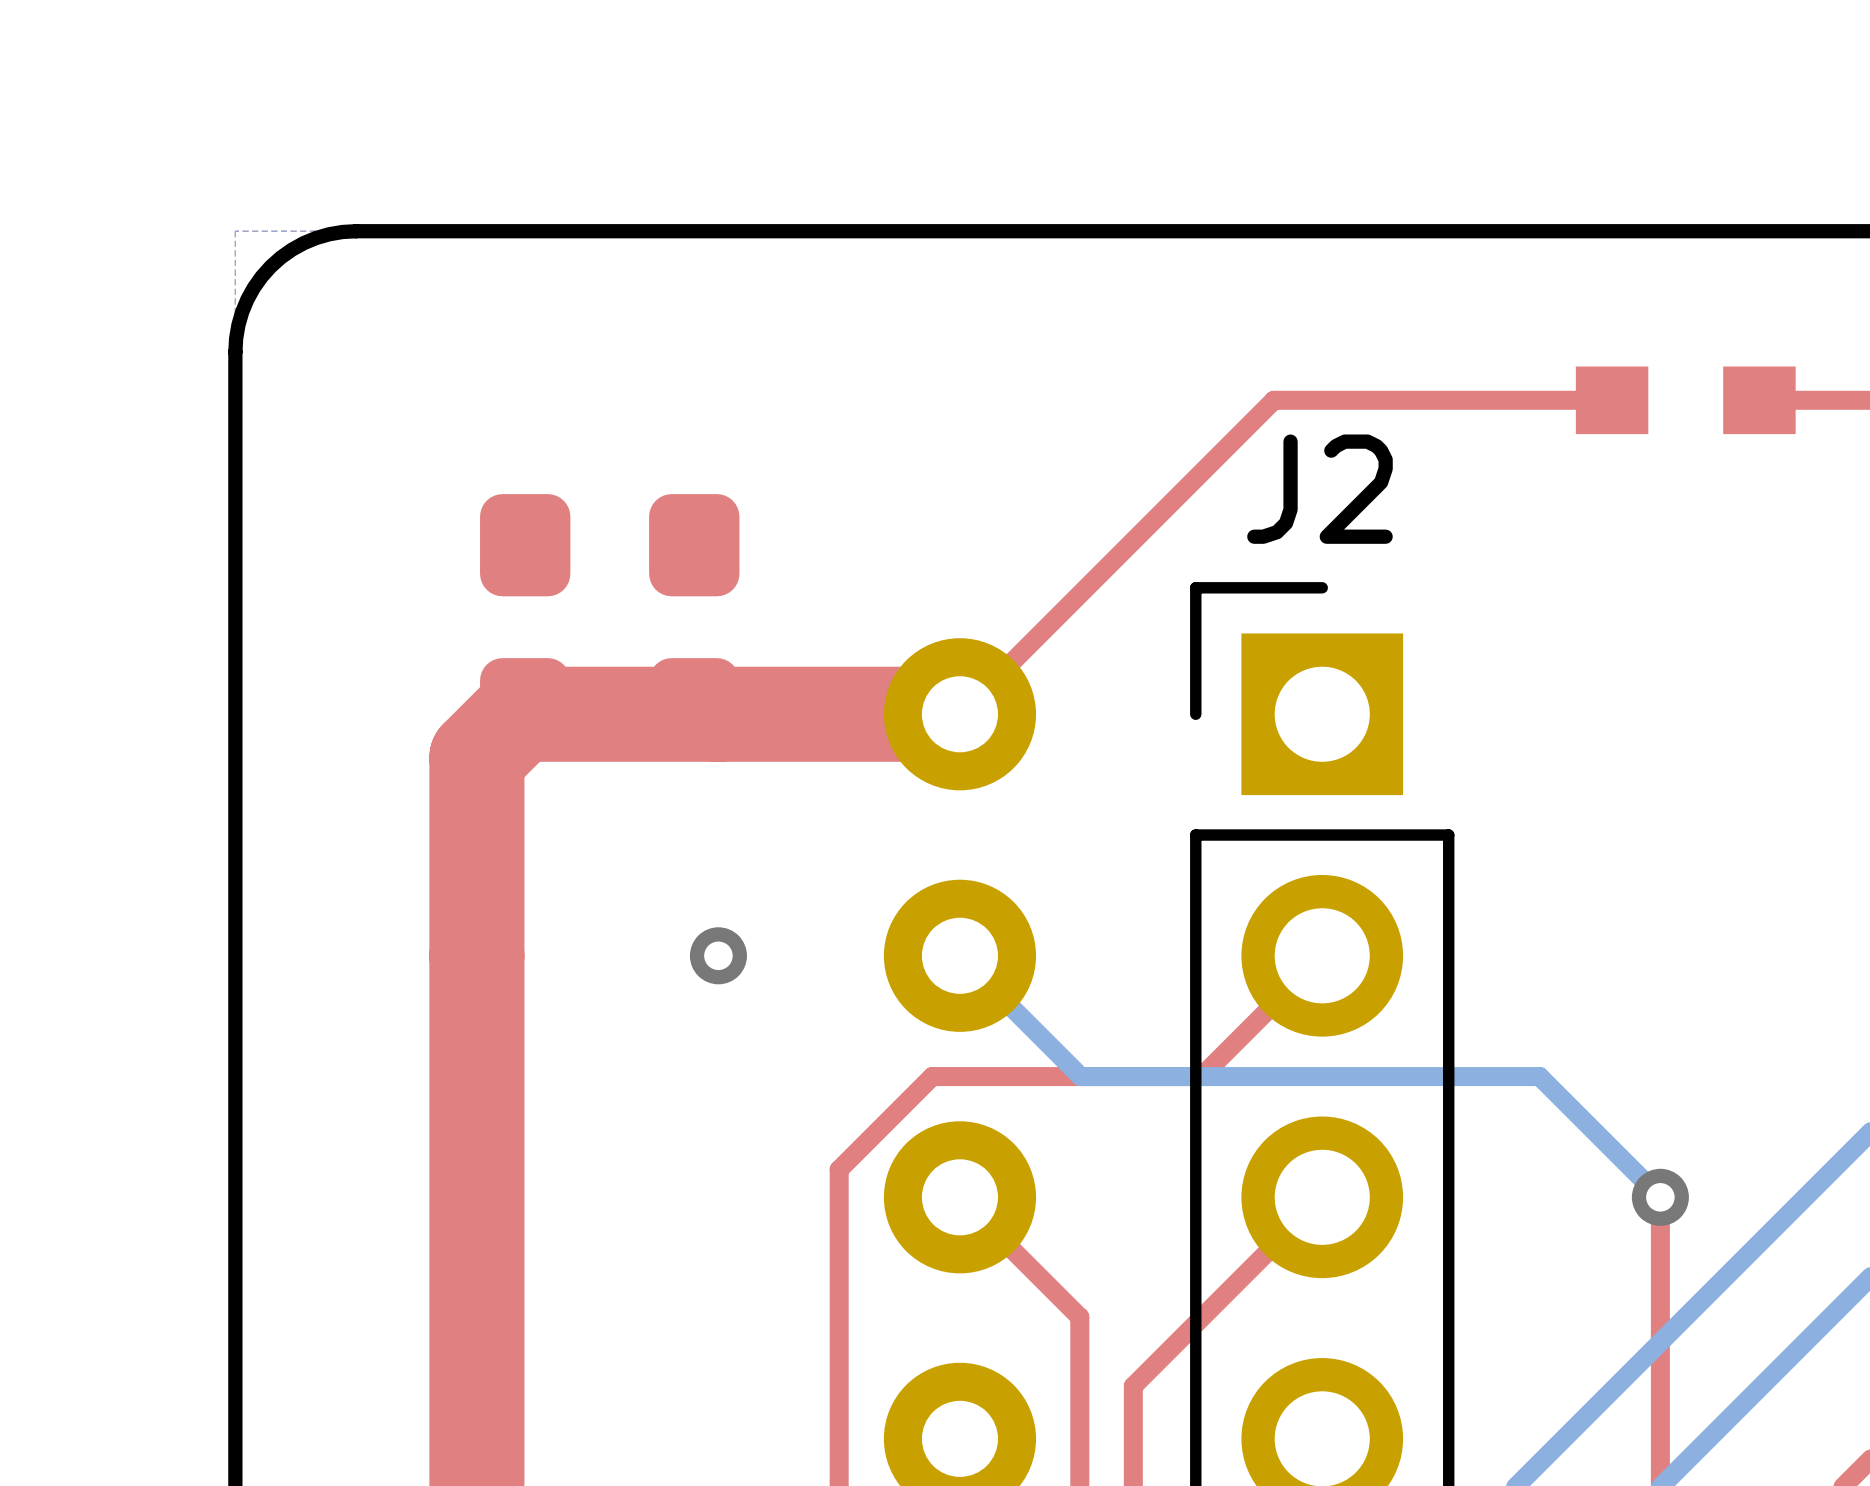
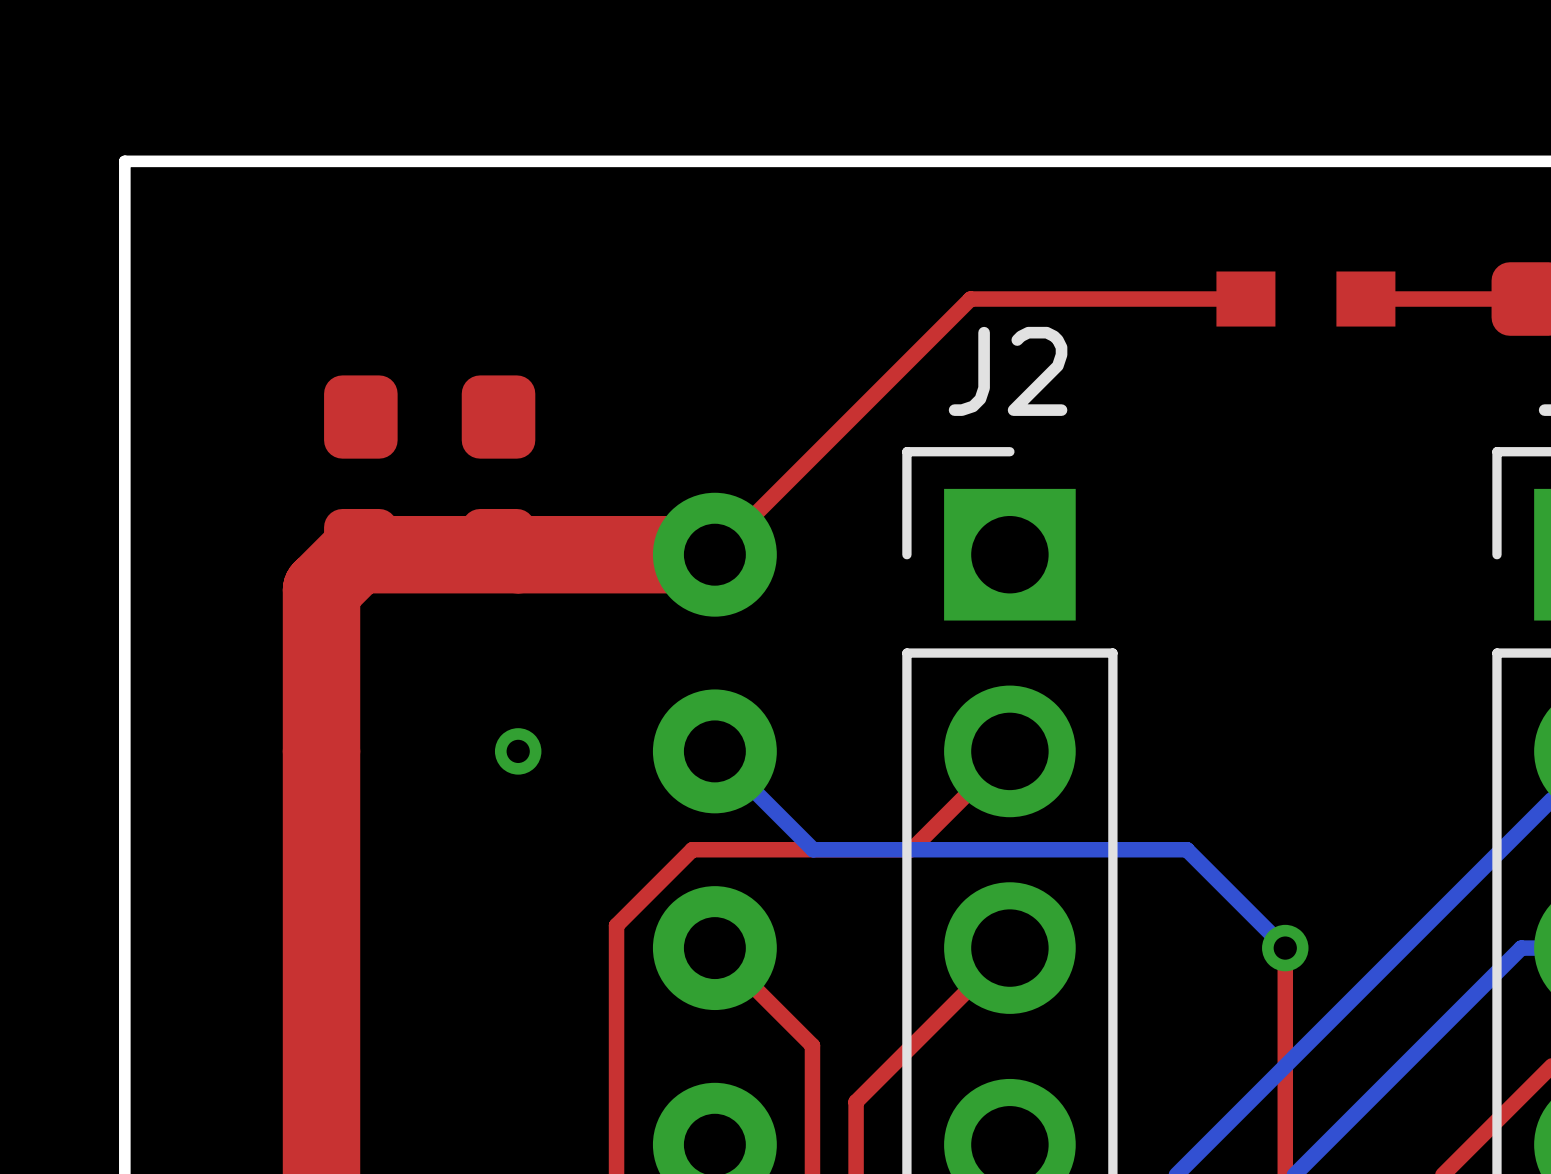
board edge: (356, 231) (329, 234) (303, 243) (280, 257) (270, 266) (261, 276) (247, 299) (238, 325) (235, 351) -> (223, 161) (124, 161) (124, 259)

